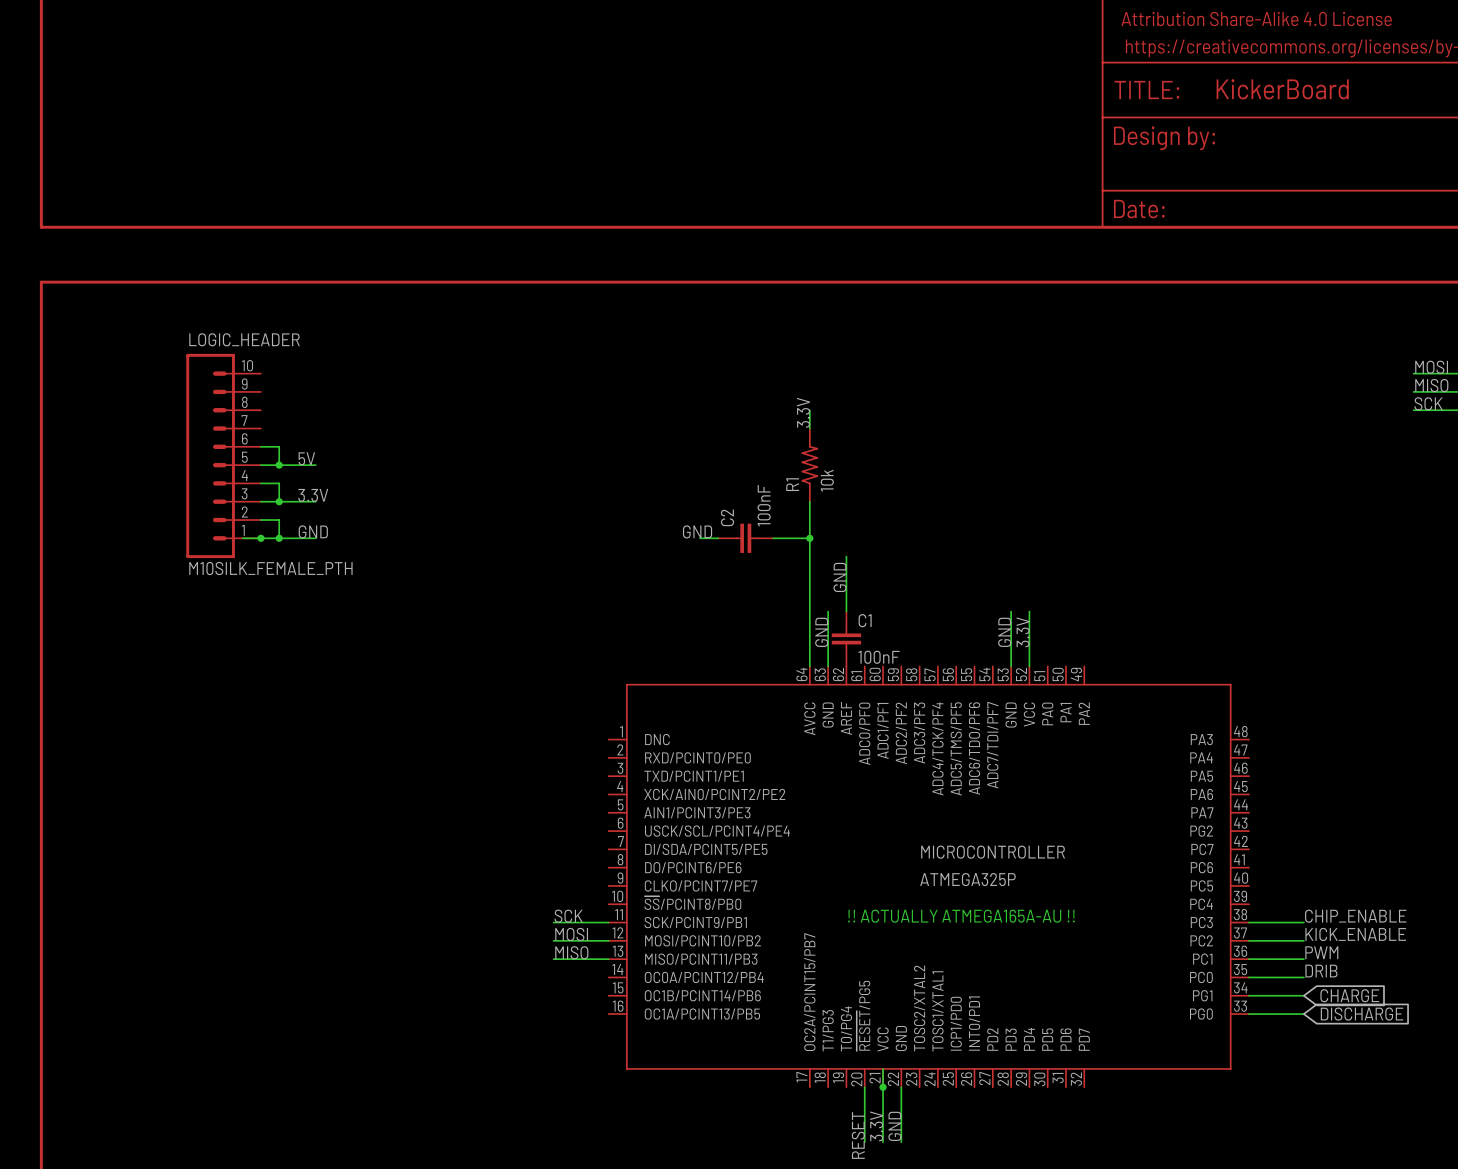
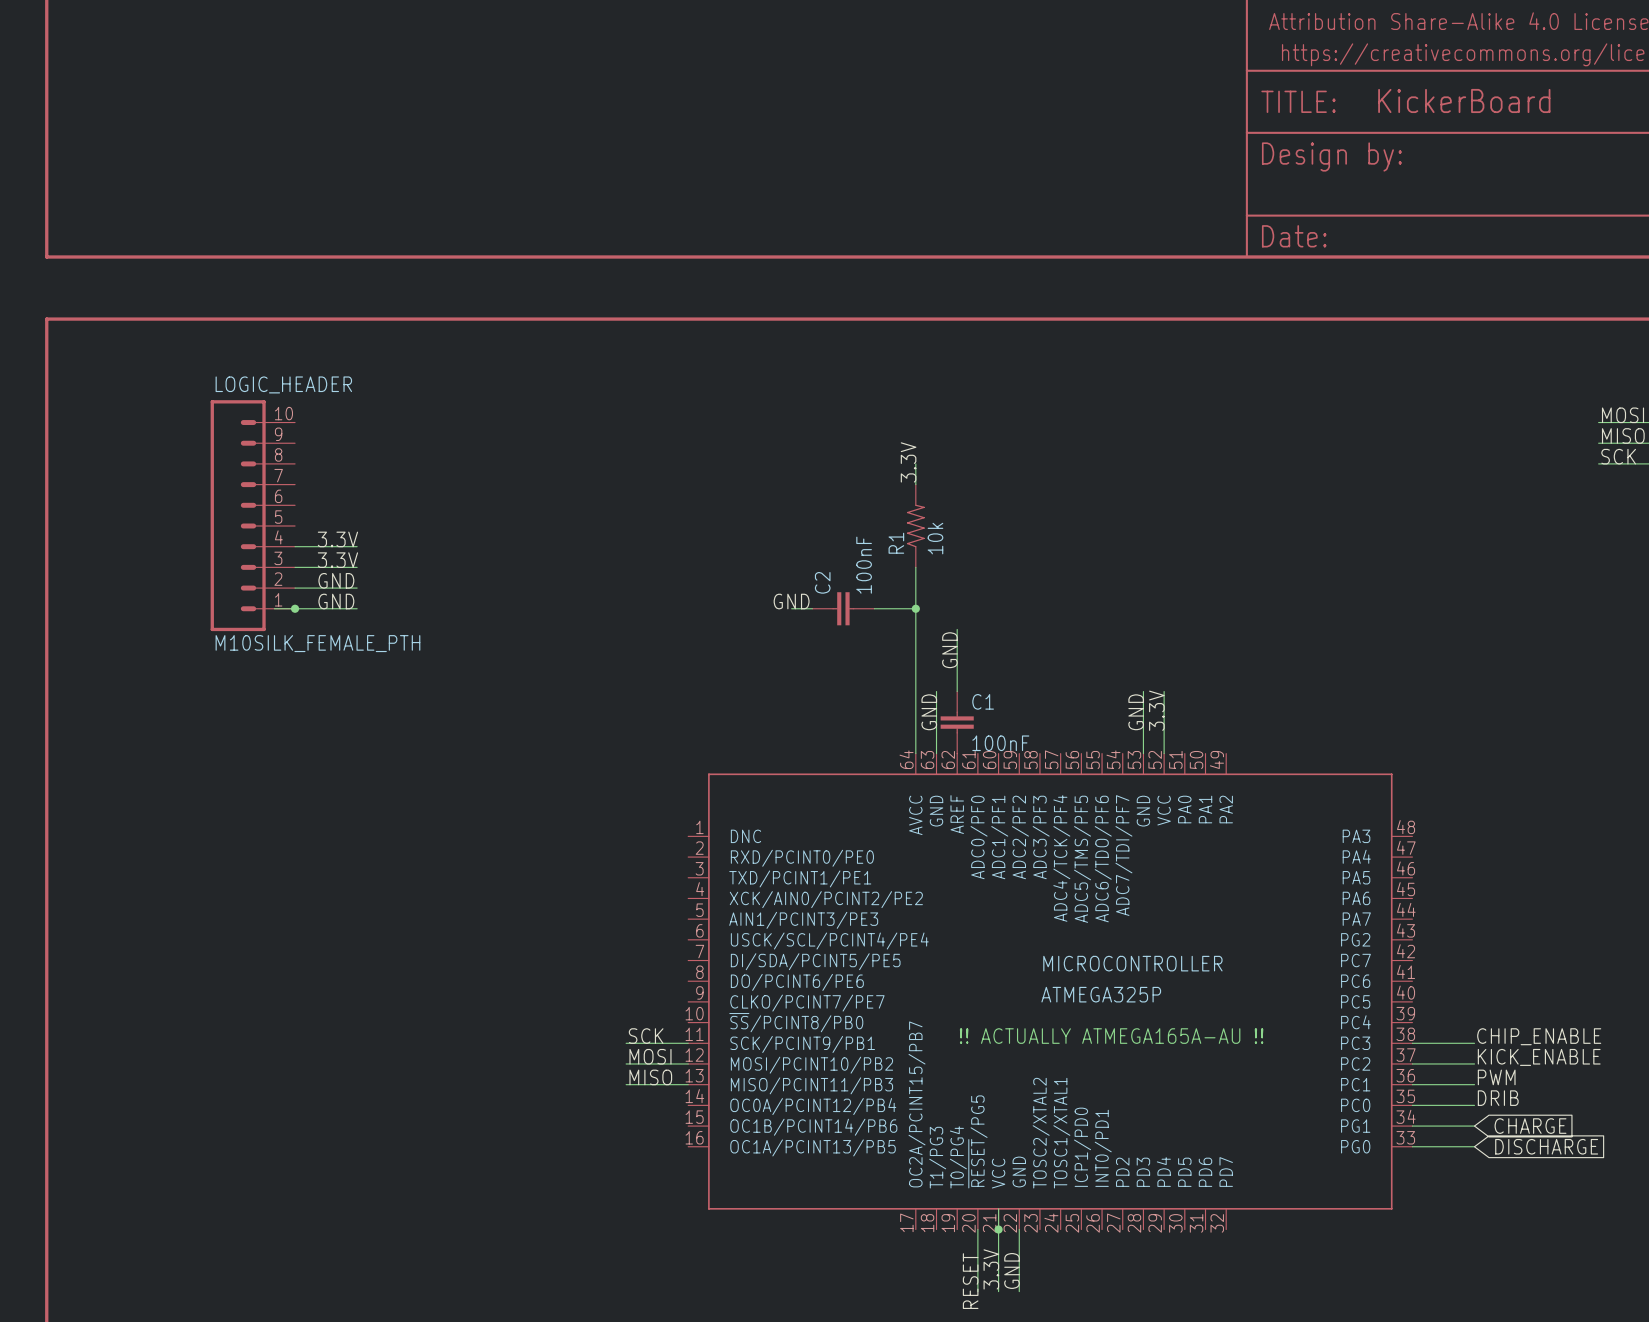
wire: (260, 446) (279, 446) (279, 465) -> none
label: 5V (306, 458) -> none
wire: (260, 465) (315, 465) -> none
junction: (279, 465) -> none
label: none -> 3.3V (337, 539)
wire: (279, 483) (279, 501) -> (315, 546) (357, 546)
label: none -> 3.3V (337, 560)
label: 3.3V (313, 495) -> none
junction: (279, 501) -> none
label: none -> GND (336, 580)
wire: (279, 520) (279, 538) -> (315, 588) (357, 588)
label: none -> GND (336, 601)
label: GND (313, 531) -> none
junction: (279, 538) -> none

